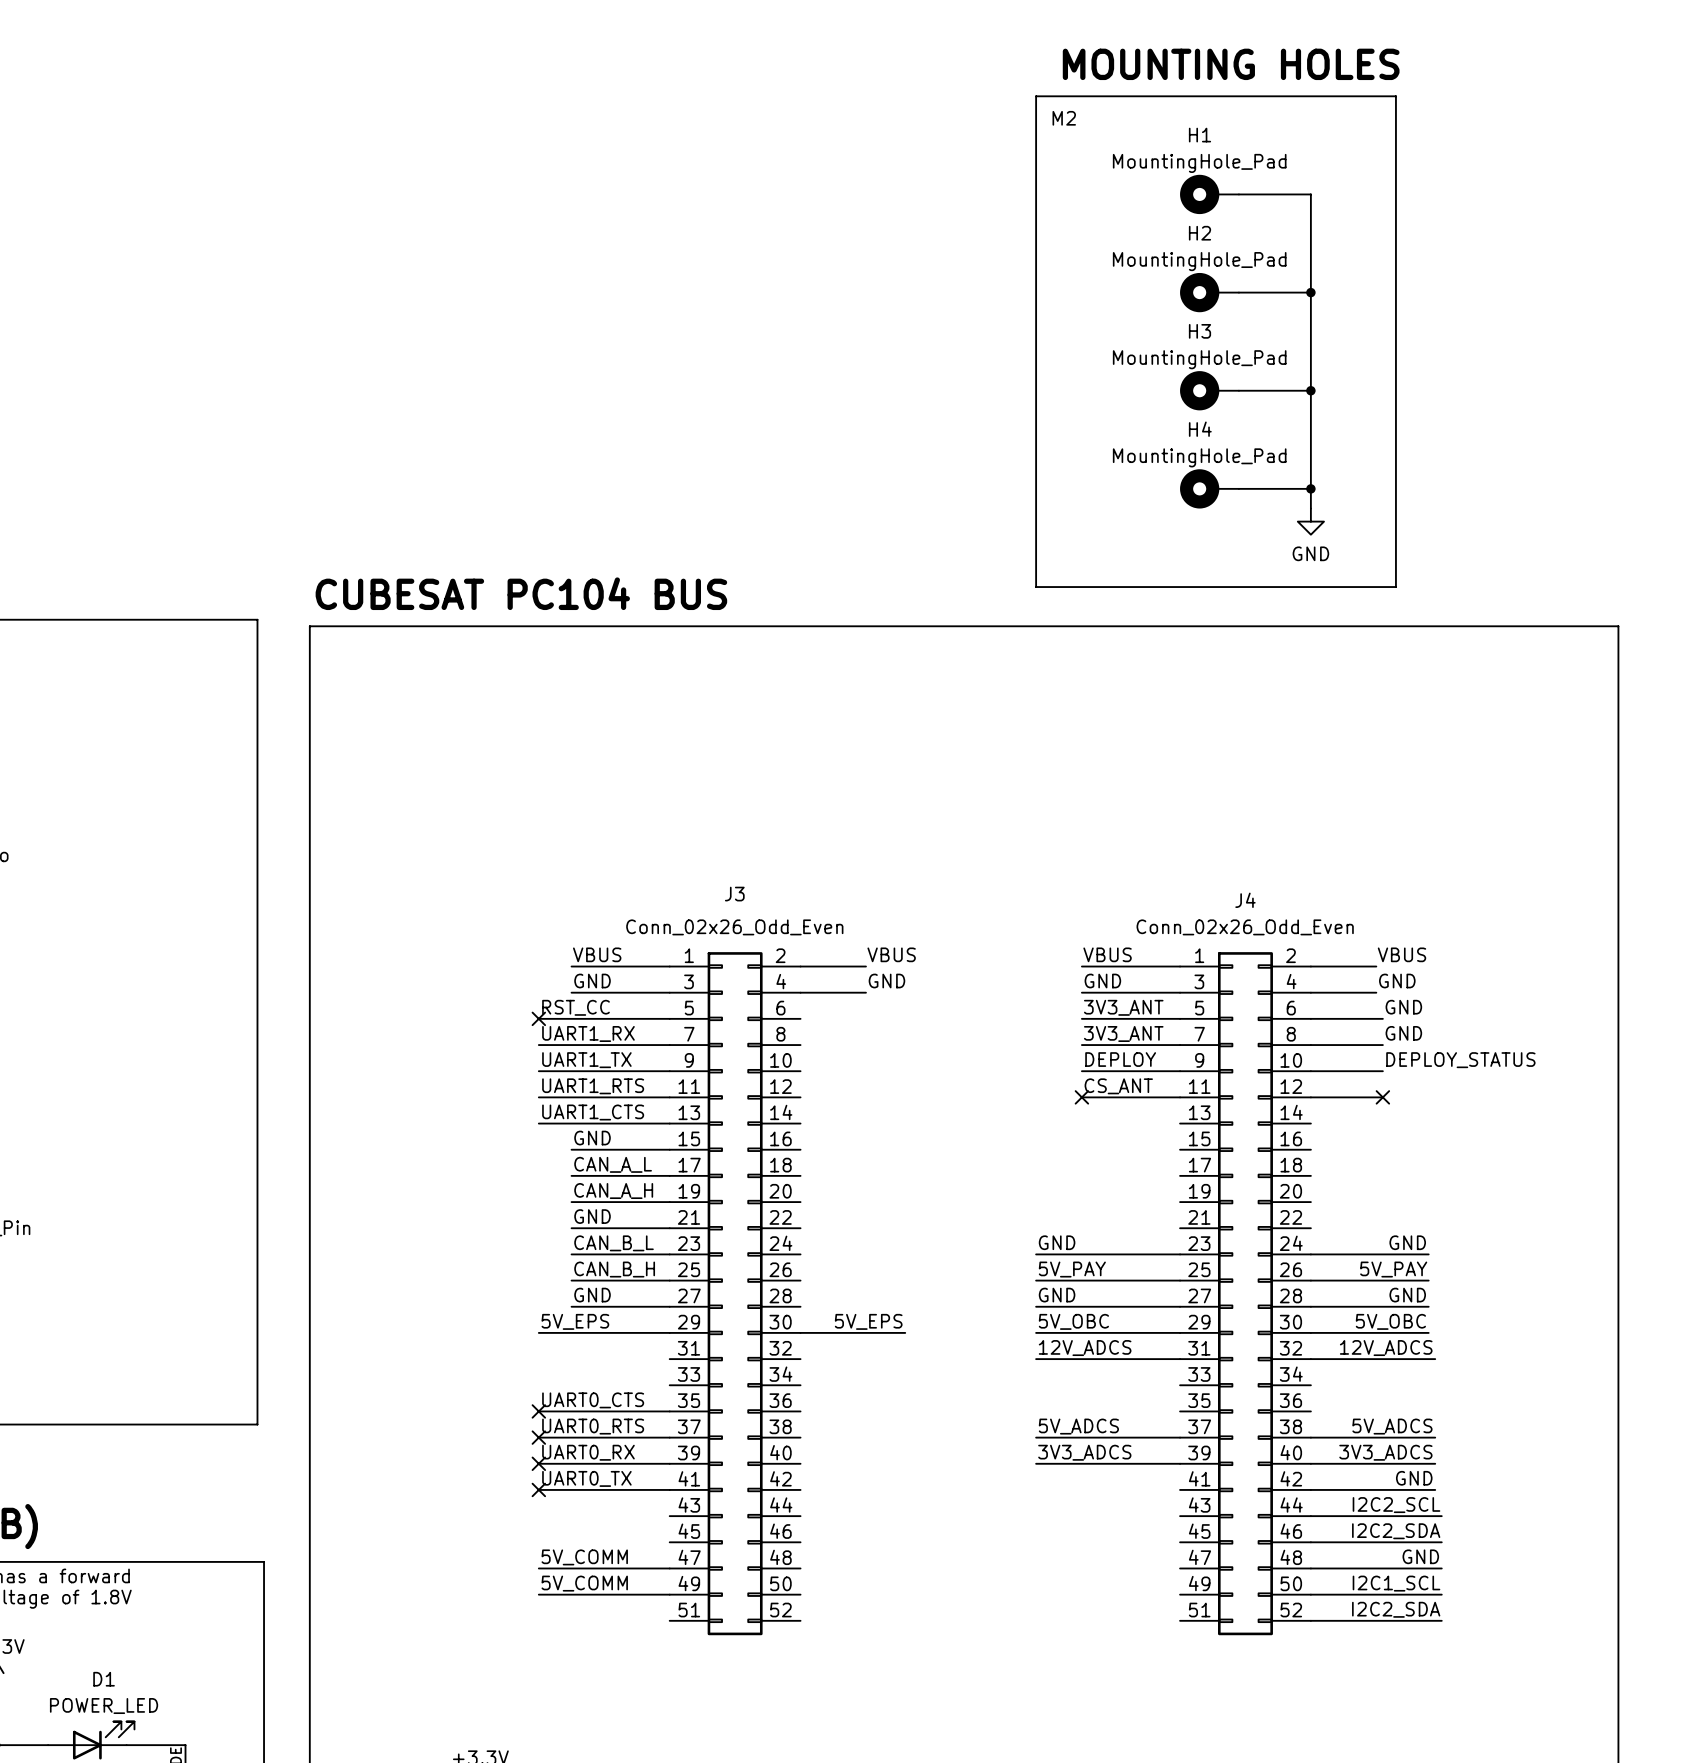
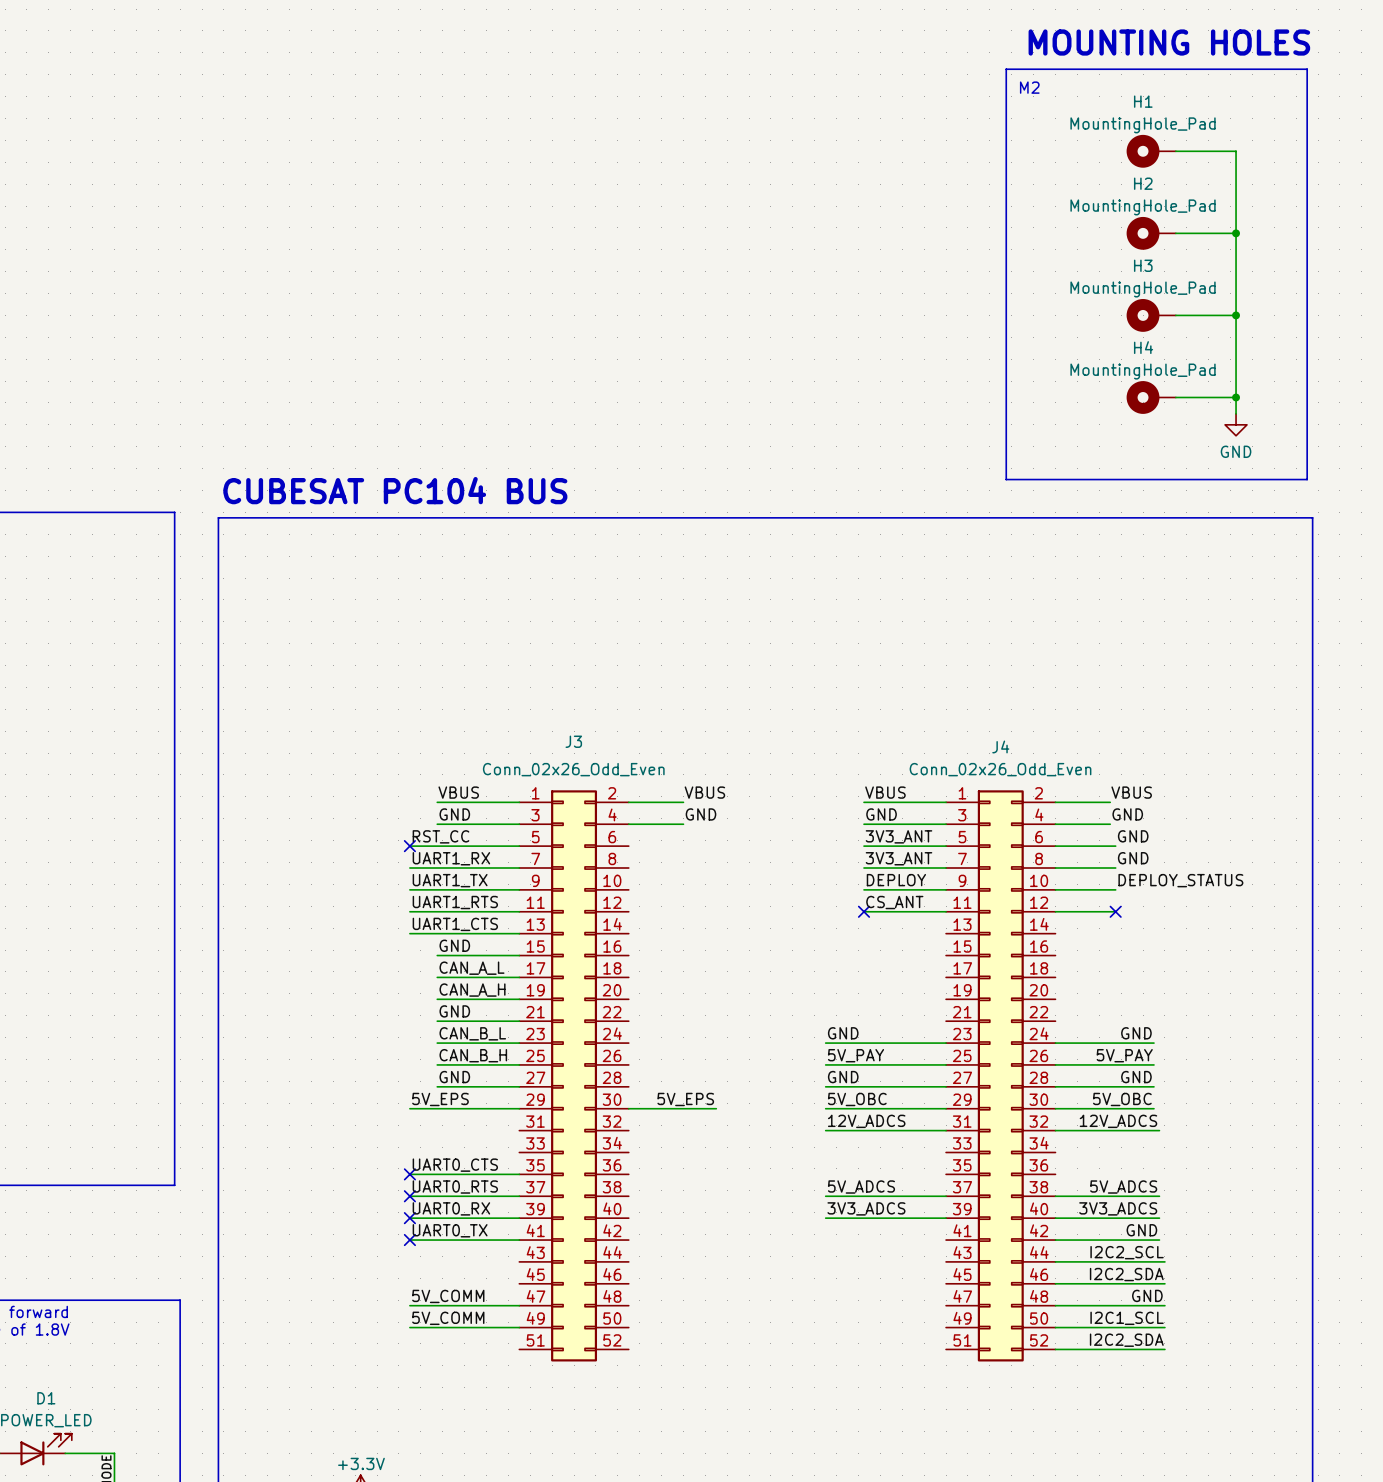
text position: MOUNTING HOLES (1231, 64) -> MOUNTING HOLES (1169, 42)
line: (1036, 96) (1395, 96) (1395, 587) (1036, 587) (1036, 96) -> (1006, 69) (1307, 69) (1307, 479) (1006, 479) (1006, 69)
text position: M2 (1064, 118) -> M2 (1029, 87)
H1 position: (1209, 194) -> (1151, 151)
wire: (1238, 194) (1310, 194) (1310, 508) -> (1175, 151) (1236, 151) (1236, 413)
junction: none -> (1236, 233)
H2 position: (1209, 292) -> (1151, 233)
wire: (1238, 292) (1310, 292) -> (1175, 233) (1236, 233)
junction: (1310, 292) -> none
junction: none -> (1236, 315)
H3 position: (1209, 390) -> (1151, 315)
wire: (1238, 390) (1310, 390) -> (1175, 315) (1236, 315)
junction: (1310, 390) -> none
junction: none -> (1236, 397)
H4 position: (1209, 488) -> (1151, 397)
wire: (1238, 488) (1310, 488) -> (1175, 397) (1236, 397)
junction: (1310, 488) -> none
power symbol position: GND (1310, 521) -> GND (1236, 424)

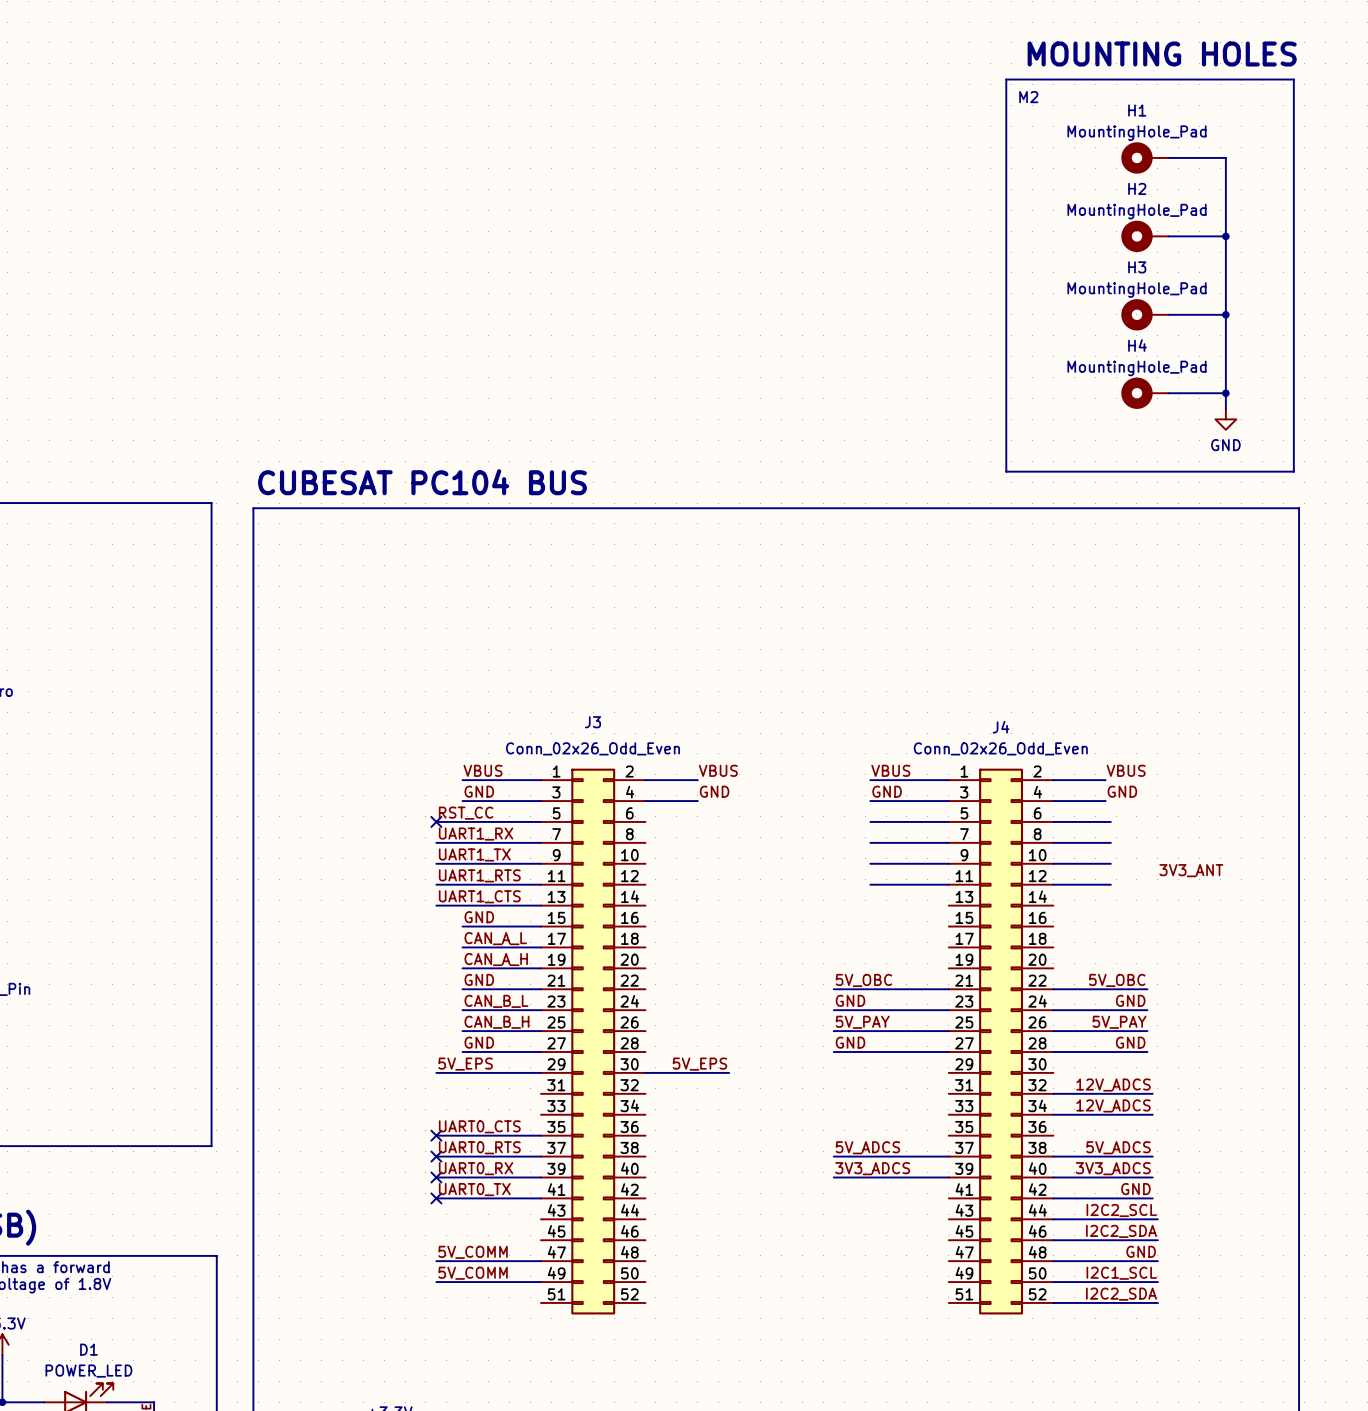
label: 3V3_ANT (898, 836) -> none
label: GND (1133, 836) -> none
label: 3V3_ANT (898, 858) -> none
label: GND (1133, 858) -> none
label: DEPLOY (896, 880) -> none
label: DEPLOY_STATUS (1180, 880) -> none
label: none -> 3V3_ANT (1191, 870)
label: CS_ANT (894, 902) -> none
no-connect mark: (864, 911) -> none
no-connect mark: (1115, 911) -> none
label position: 5V_OBC (857, 1099) -> 5V_OBC (863, 980)
label position: 5V_OBC (1122, 1099) -> 5V_OBC (1117, 980)
wire: (825, 1108) (946, 1108) -> (833, 989) (948, 989)
wire: (1055, 1108) (1153, 1108) -> (1053, 989) (1147, 989)
label: 12V_ADCS (866, 1121) -> none
wire: (825, 1130) (946, 1130) -> none
label: none -> 12V_ADCS (1113, 1105)
wire: none -> (1053, 1114) (1152, 1114)

